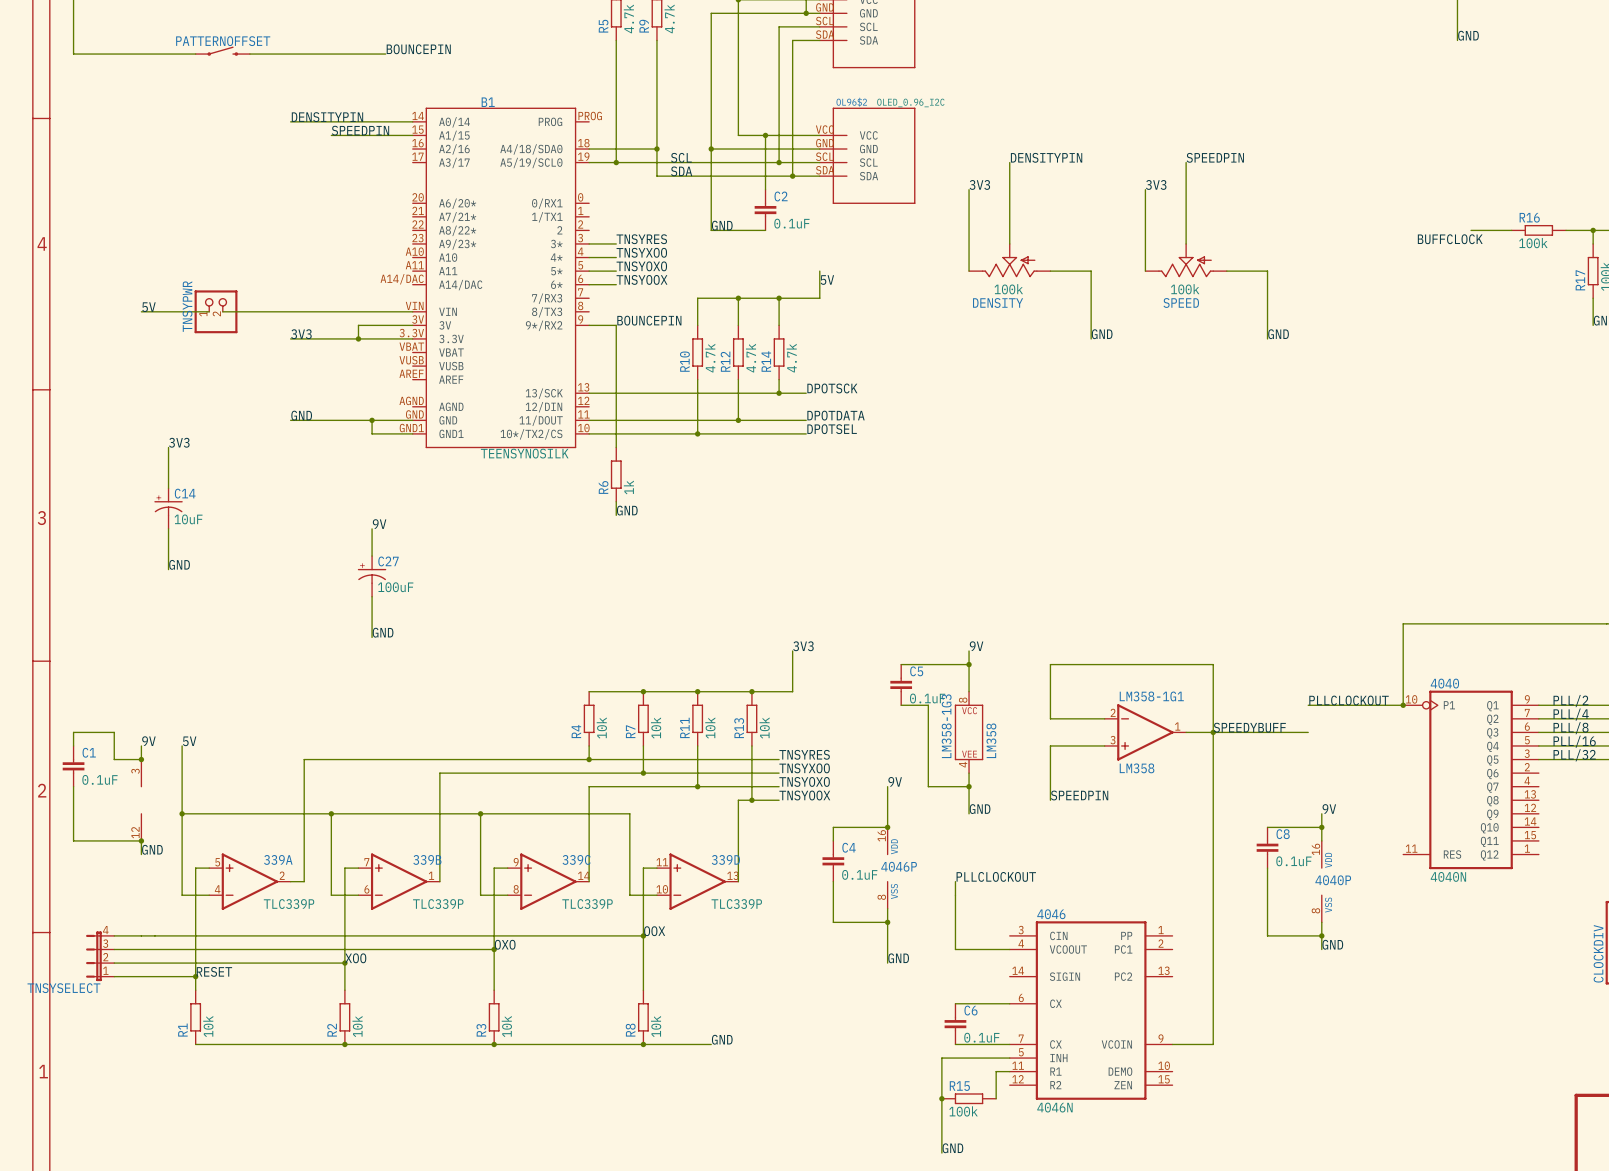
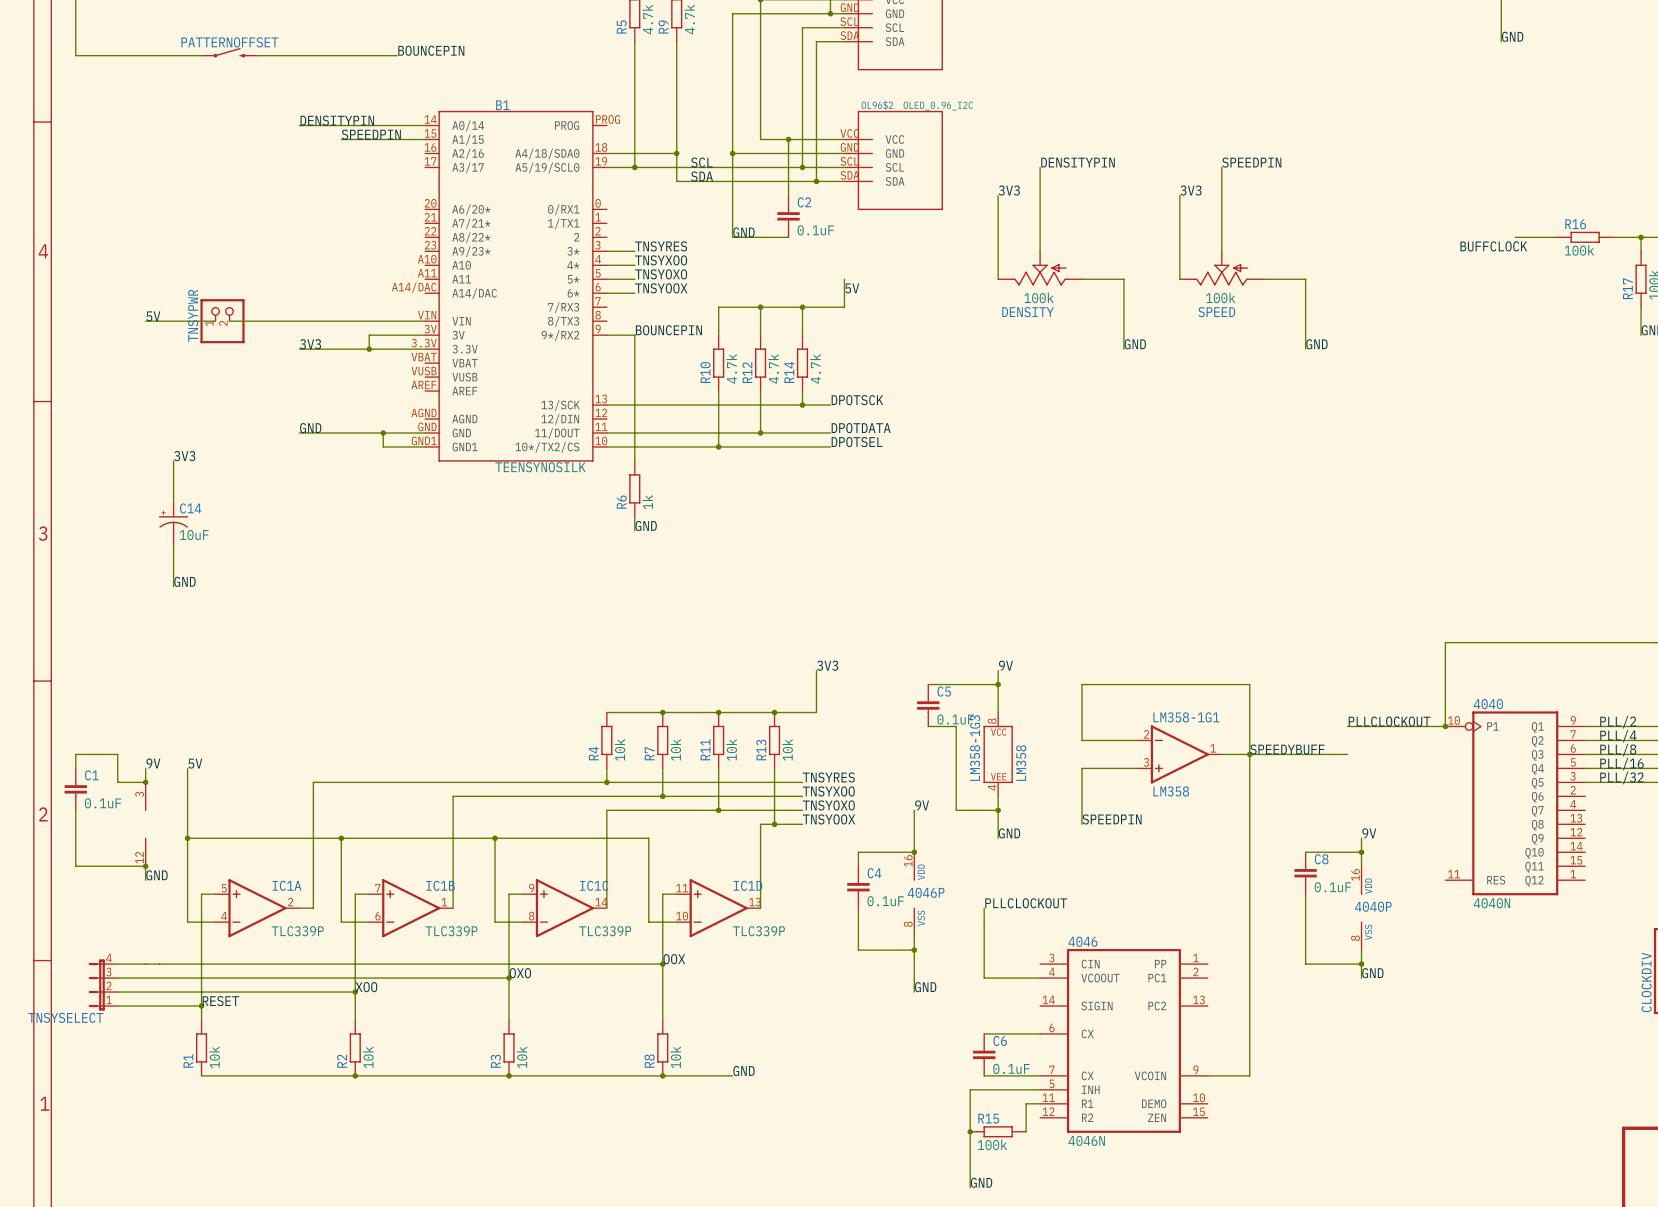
label: 9V (379, 524) -> none
wire: (372, 528) (372, 556) -> none
C27: 100uF (372, 576) -> none
wire: (372, 596) (372, 637) -> none
label: GND (383, 632) -> none
339A name: 339A (278, 859) -> IC1A (286, 885)
339B name: 339B (427, 859) -> IC1B (440, 885)
339C name: 339C (576, 859) -> IC1C (594, 885)
339D name: 339D (725, 859) -> IC1D (747, 885)

